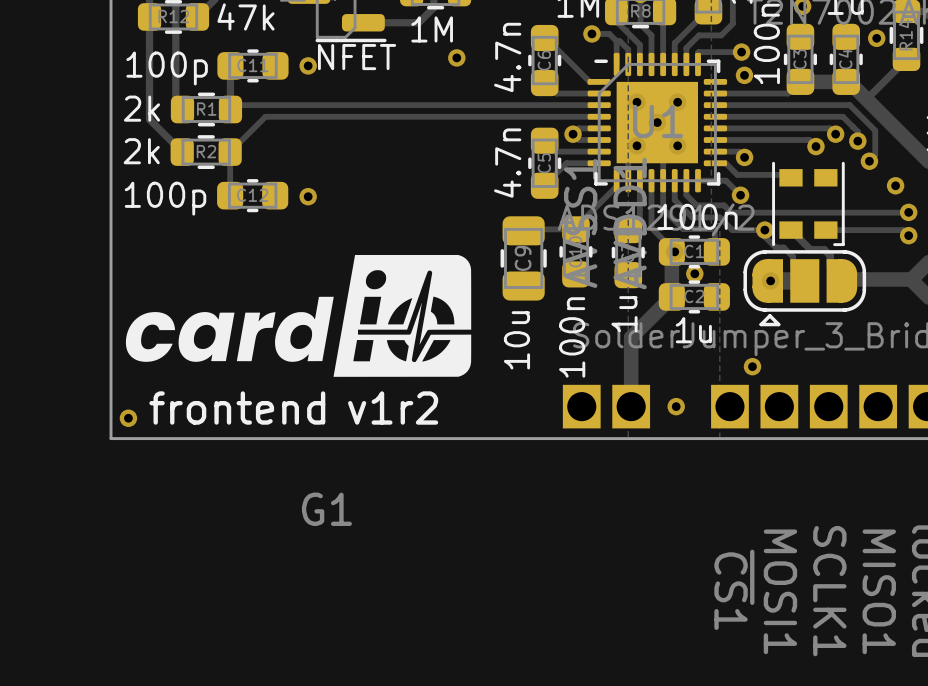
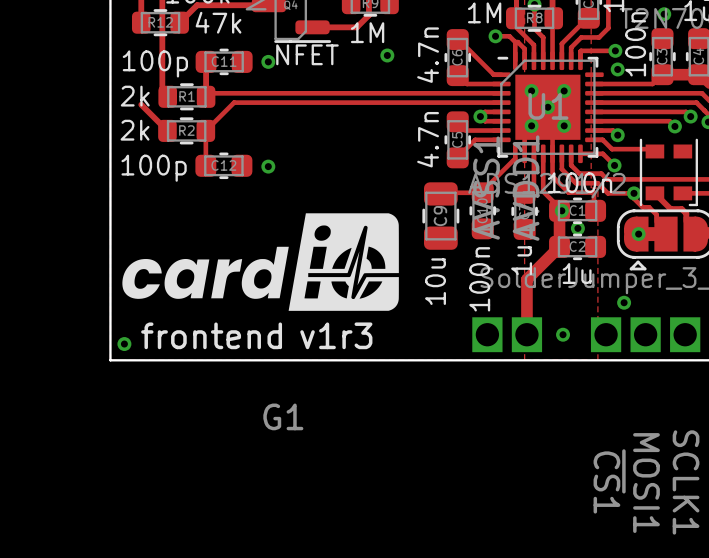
track: (149, 16) (149, 119) -> none
text: v1r2 (393, 408) -> v1r3 (336, 335)

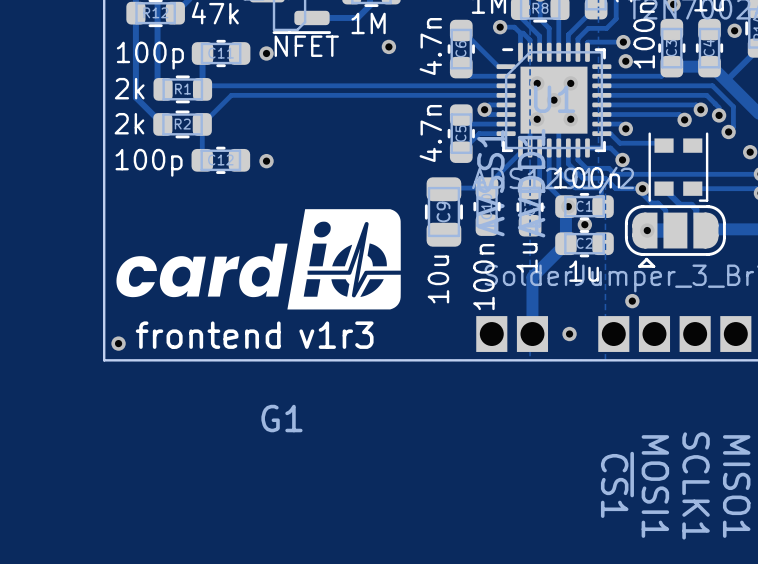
track: none -> (135, 13) (135, 97)

